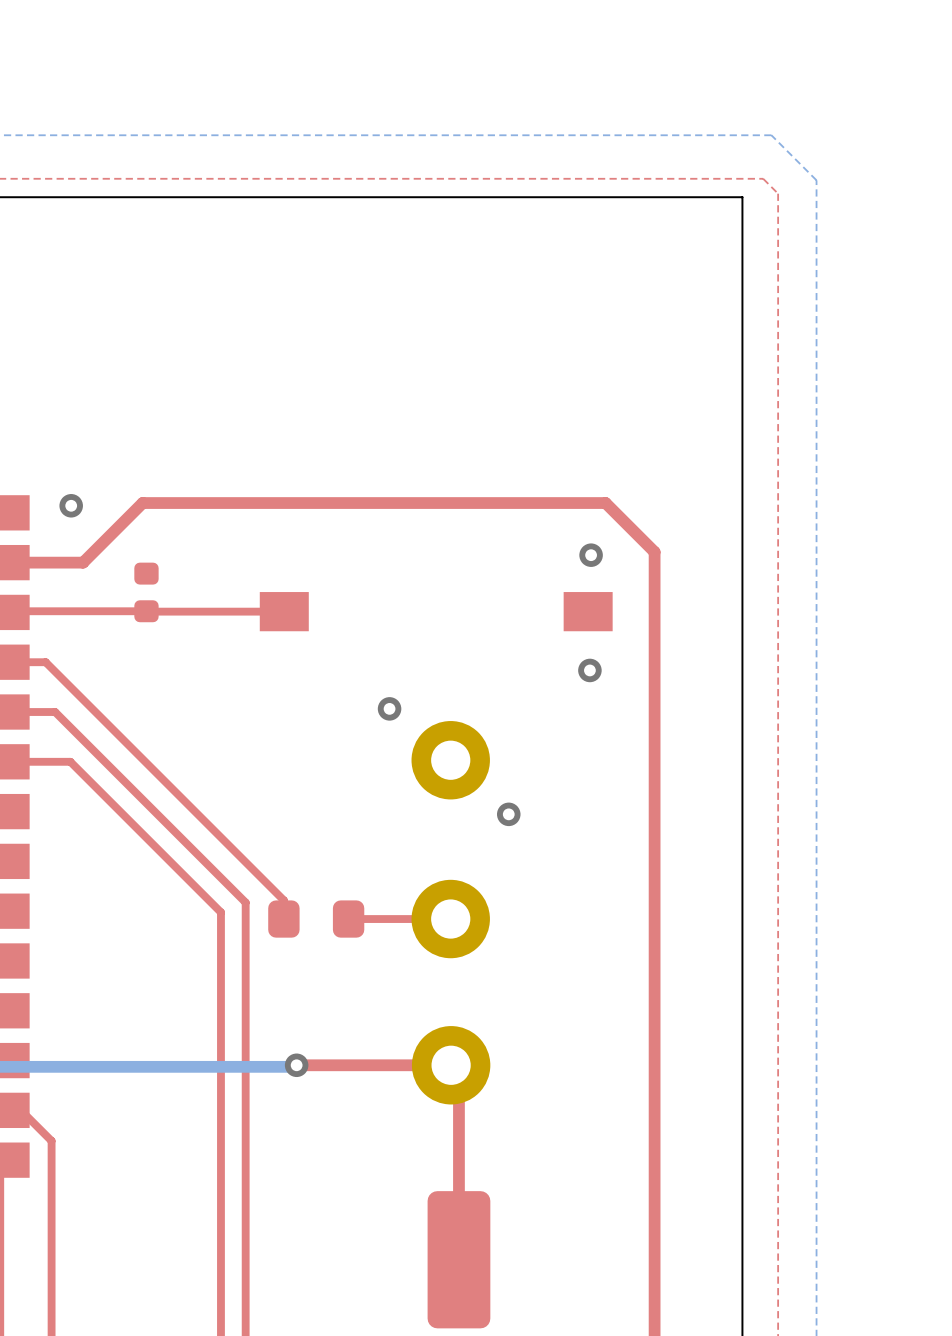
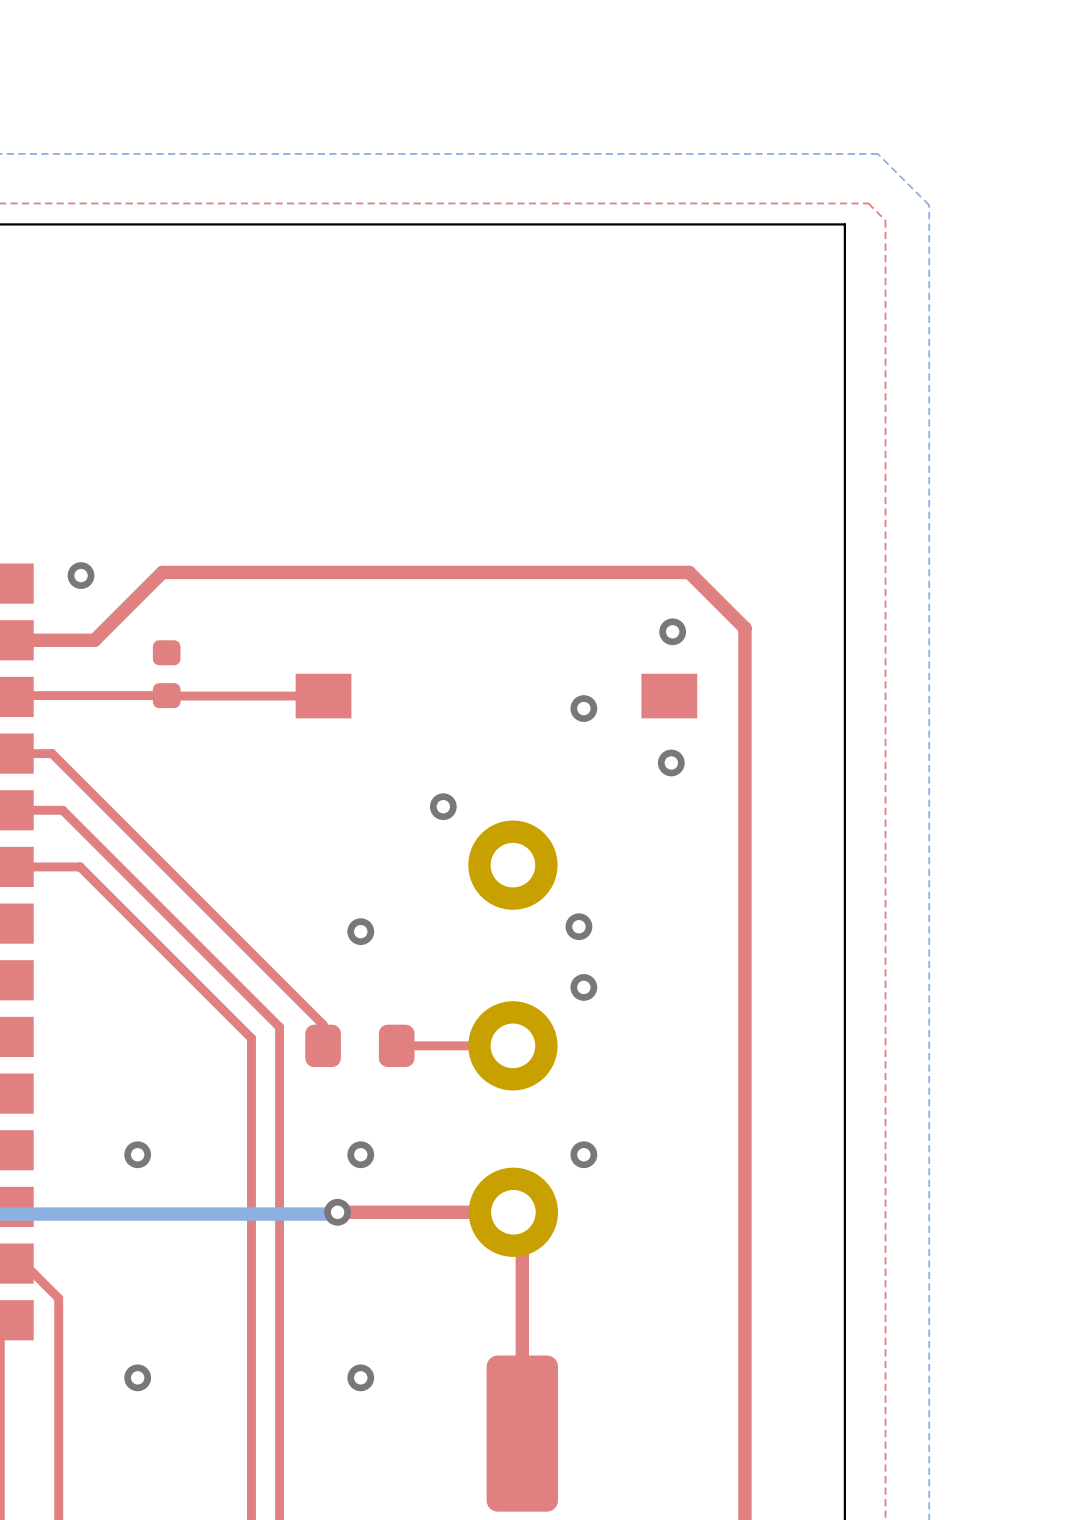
via: none -> (583, 708)
via: none -> (360, 931)
via: none -> (583, 987)
via: none -> (137, 1154)
via: none -> (360, 1154)
via: none -> (583, 1154)
via: none -> (137, 1377)
via: none -> (360, 1377)

